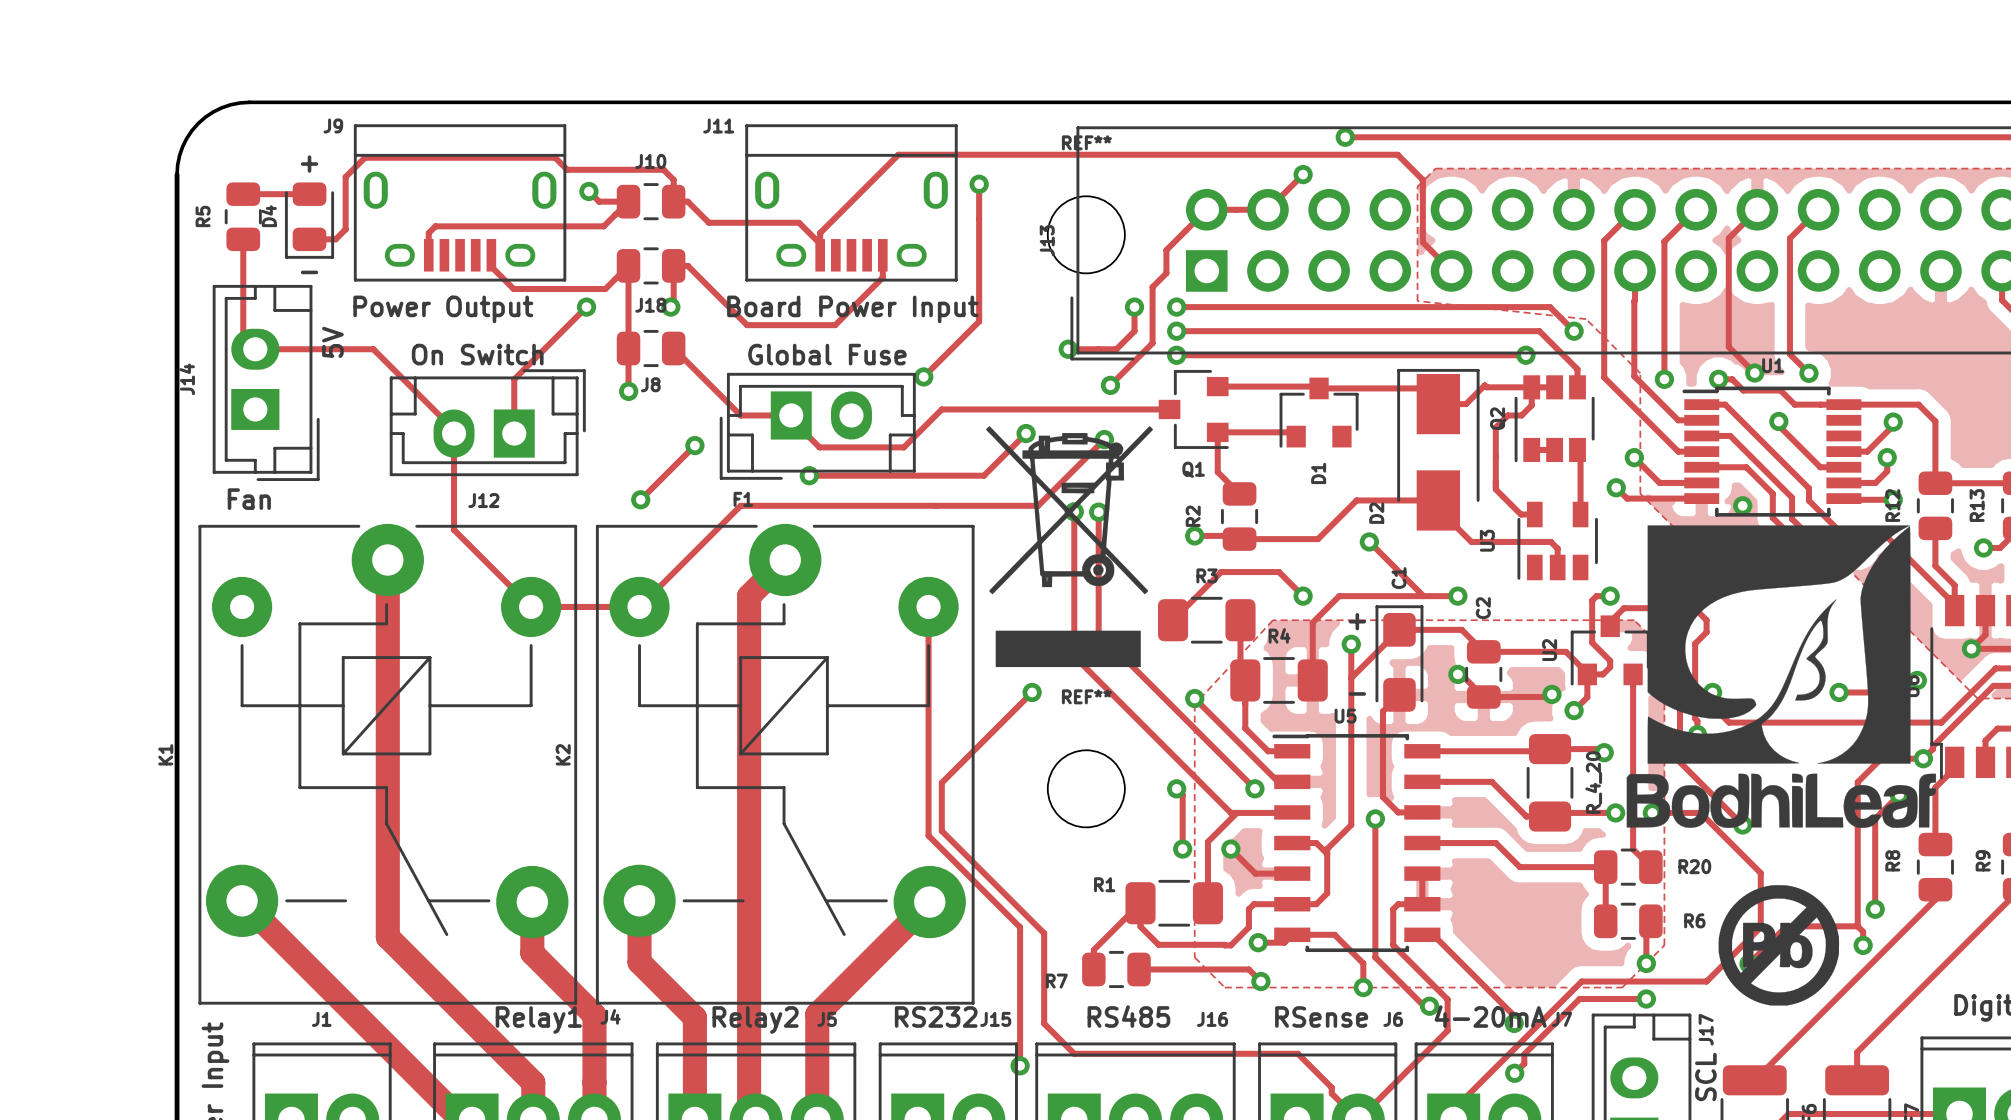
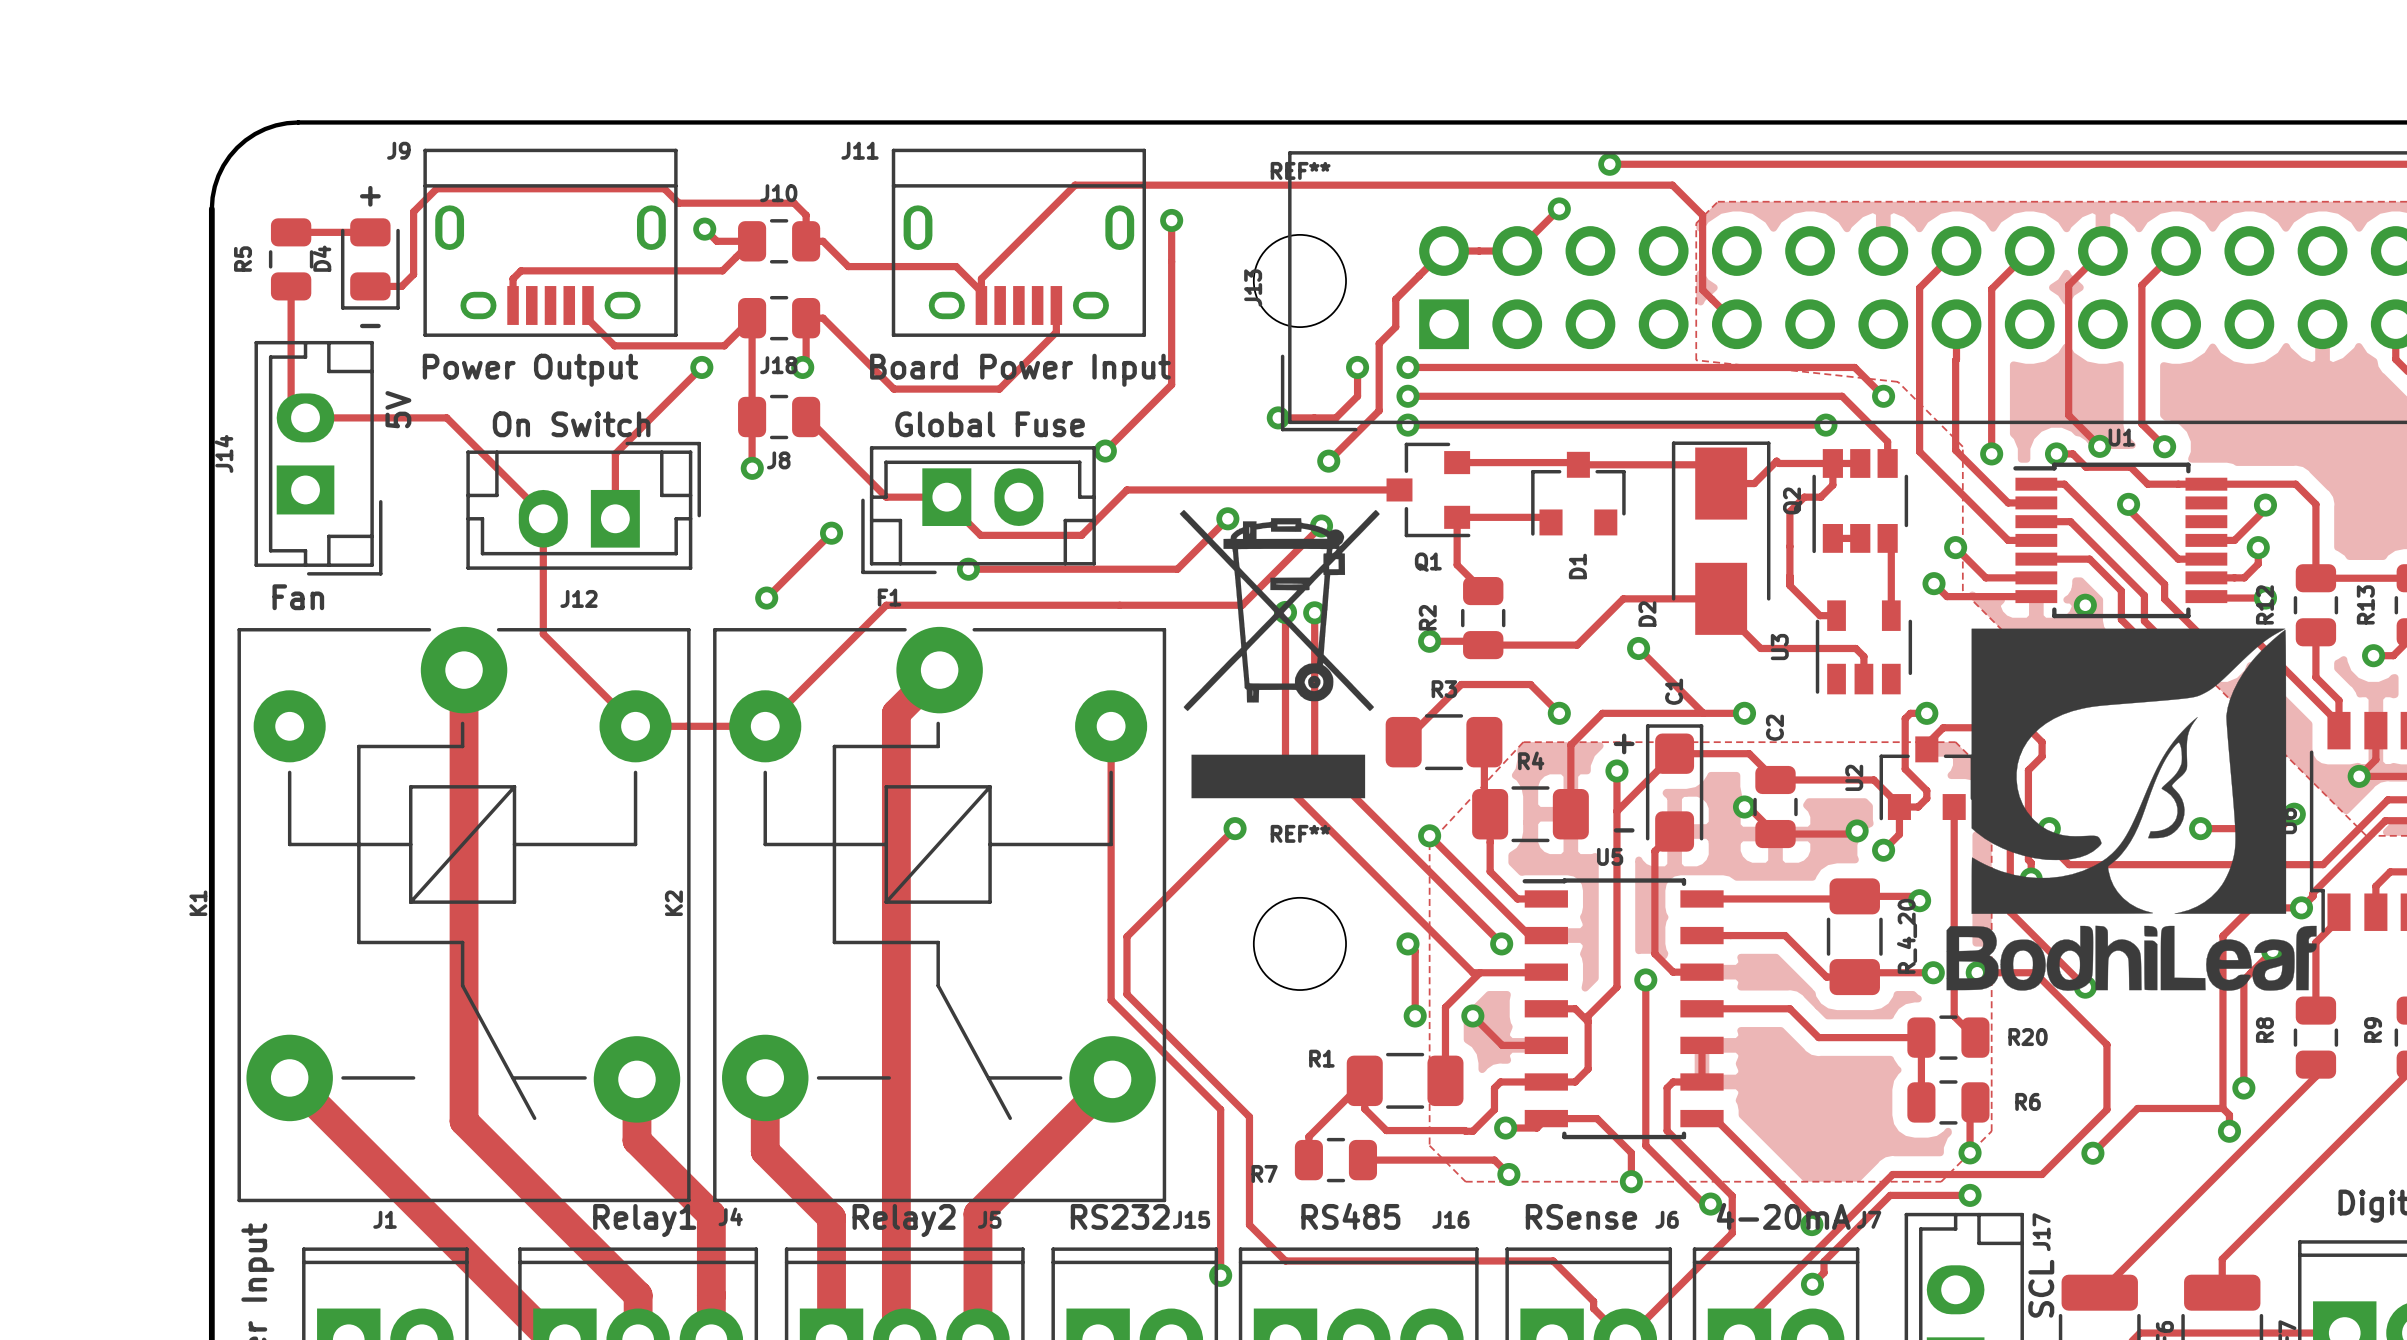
drawing: [1718, 885, 1840, 1006] -> none

